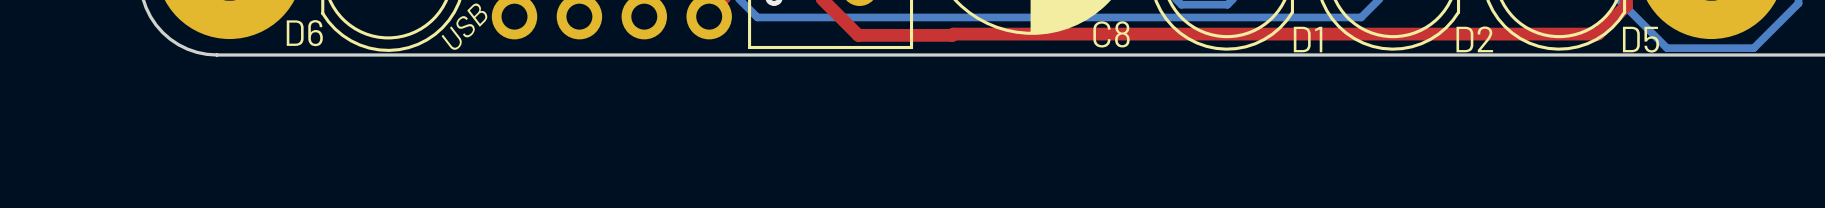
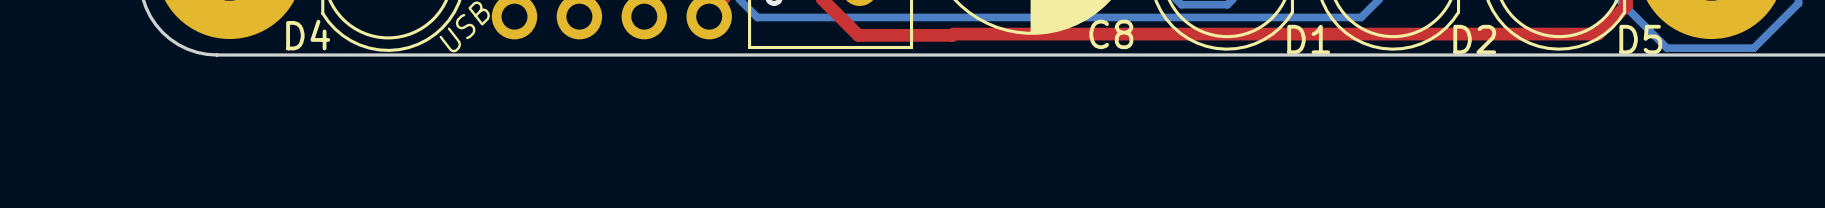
D6 name: D6 (304, 33) -> D4 (308, 35)

